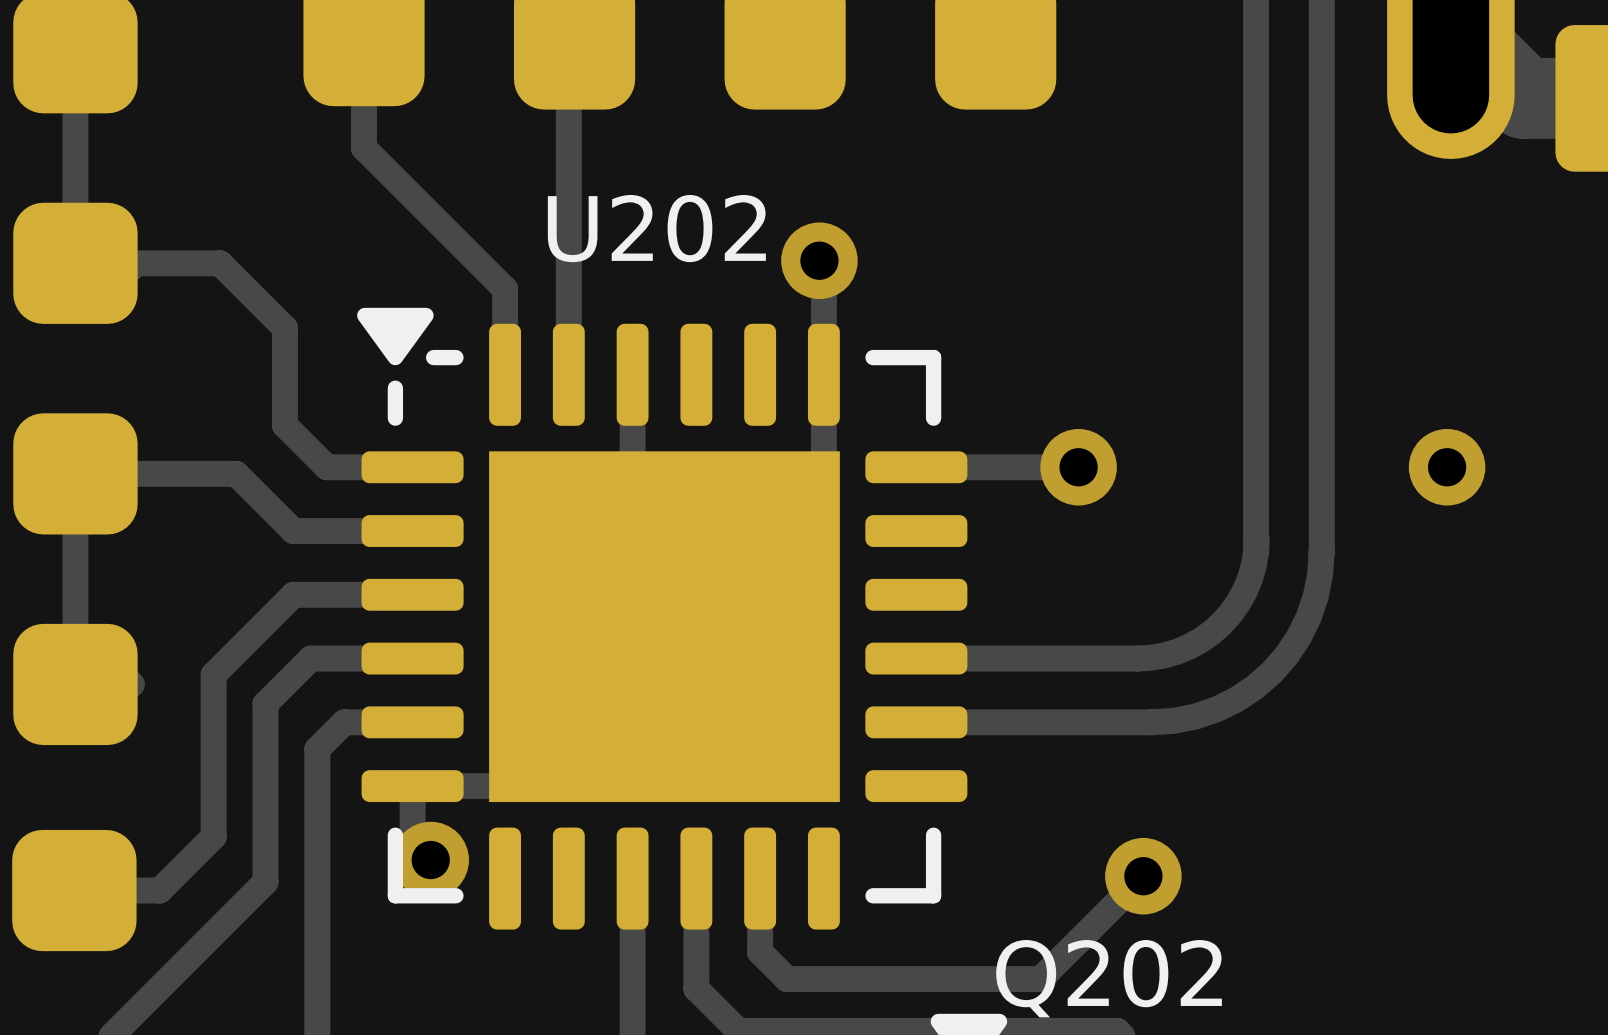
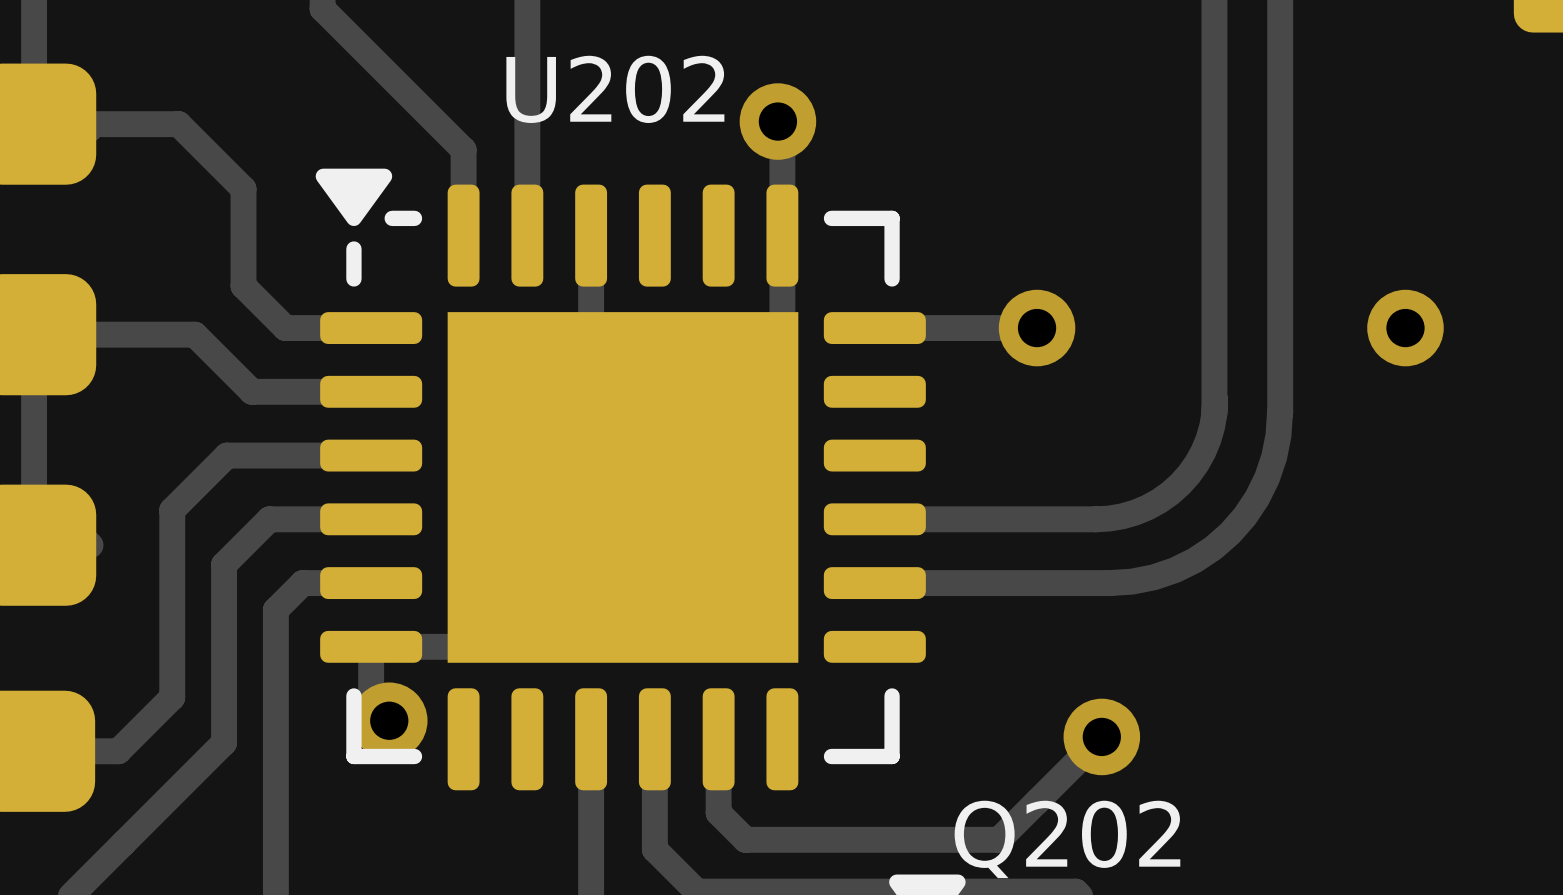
track: (293, 594) (213, 674) -> (252, 455) (226, 455) (172, 510) (172, 535)

